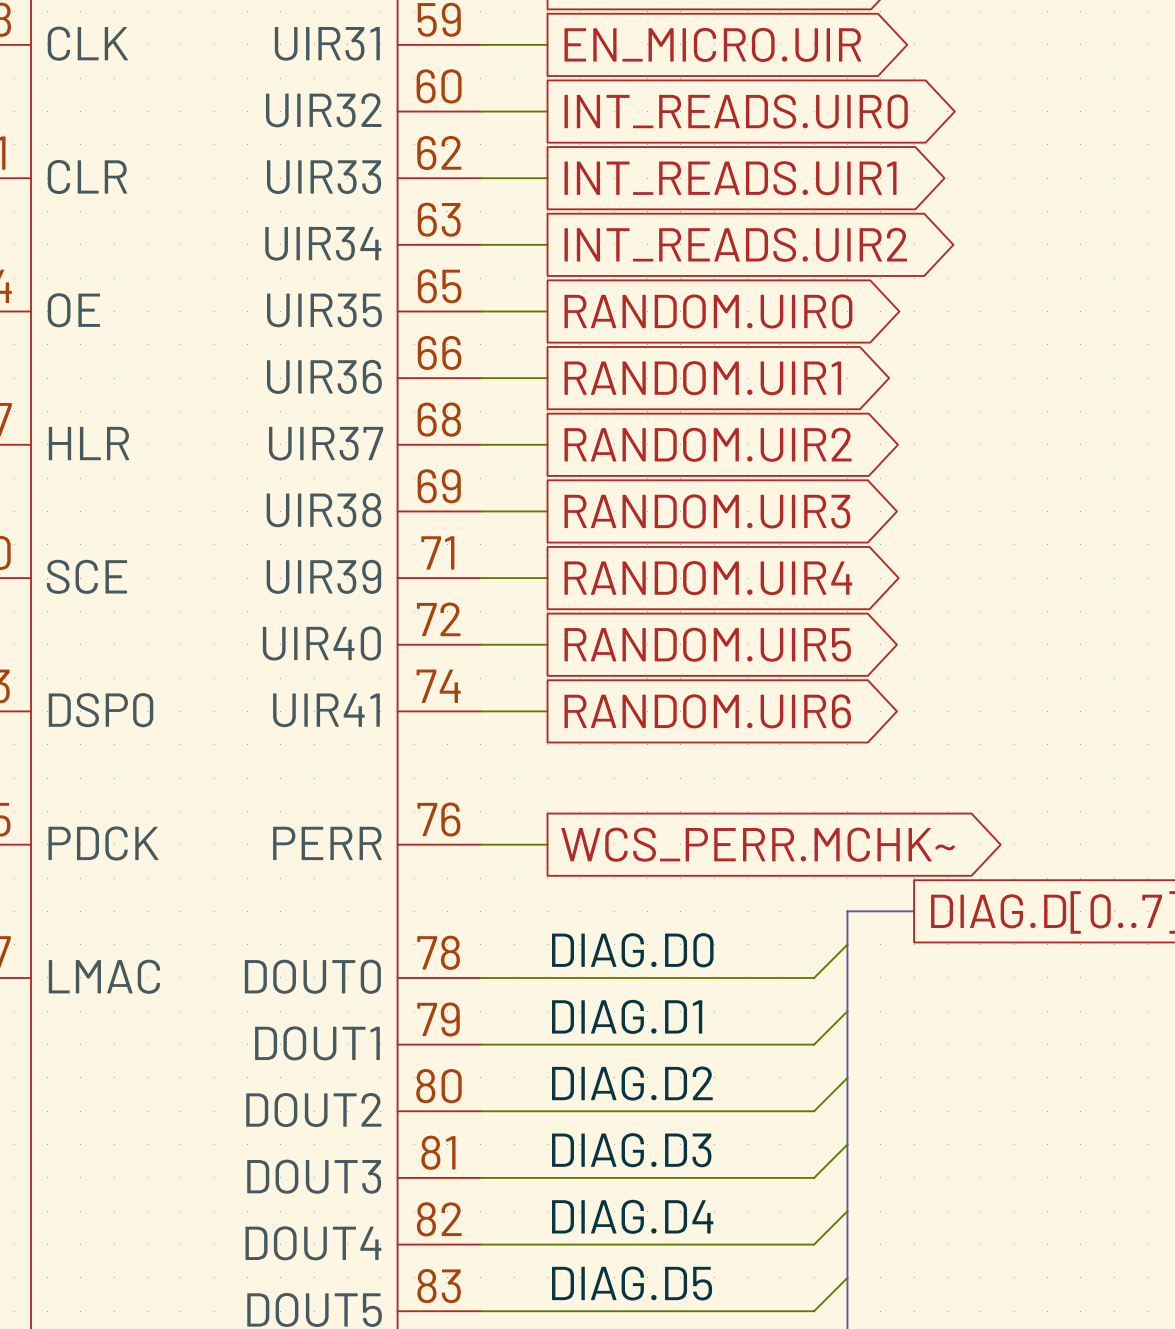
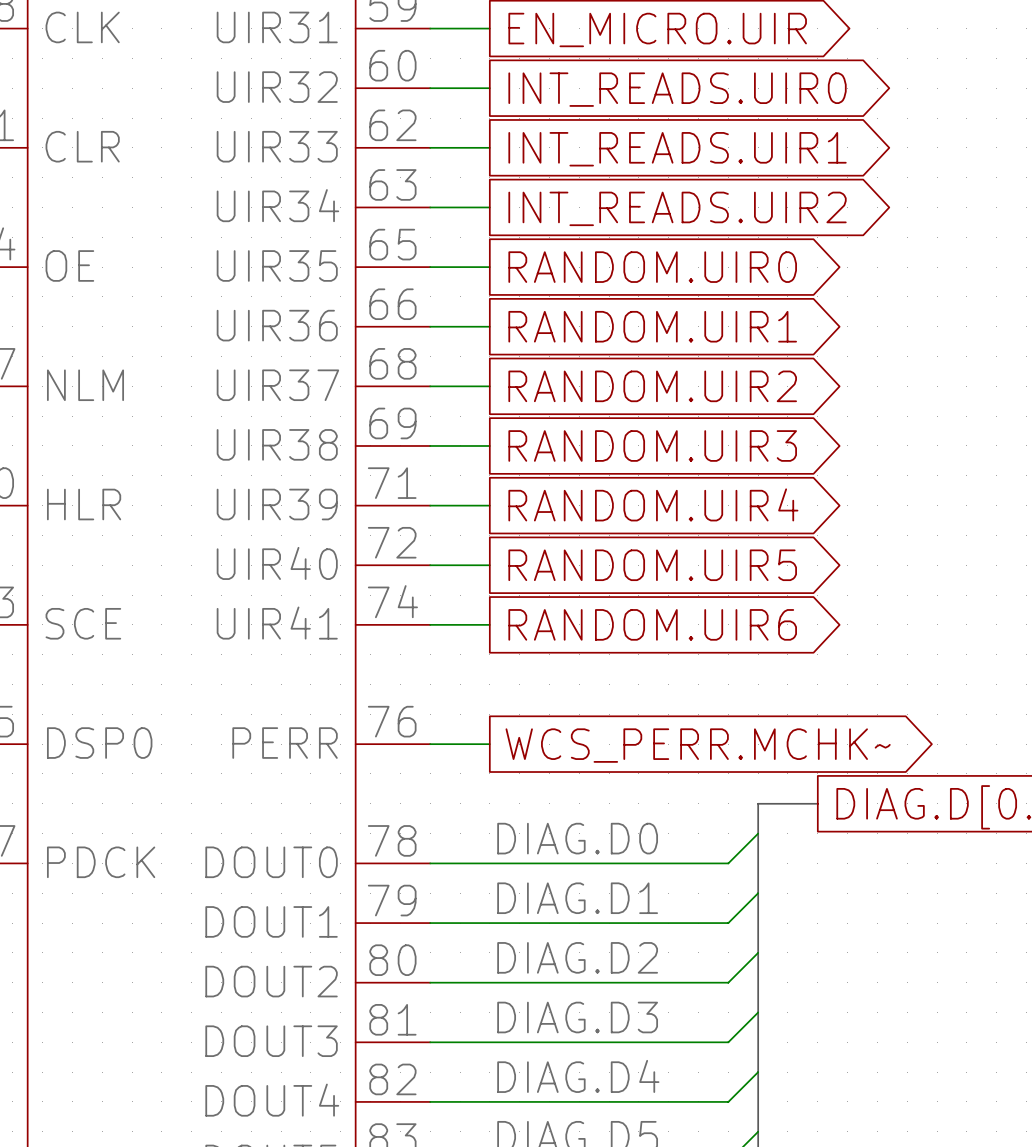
part pin name: HLR (89, 443) -> NLM (85, 385)
part pin name: SCE (86, 576) -> HLR (84, 504)
part pin name: DSP0 (101, 710) -> SCE (83, 623)
part pin name: PDCK (103, 843) -> DSP0 (99, 743)
part pin name: LMAC (104, 976) -> PDCK (101, 862)

